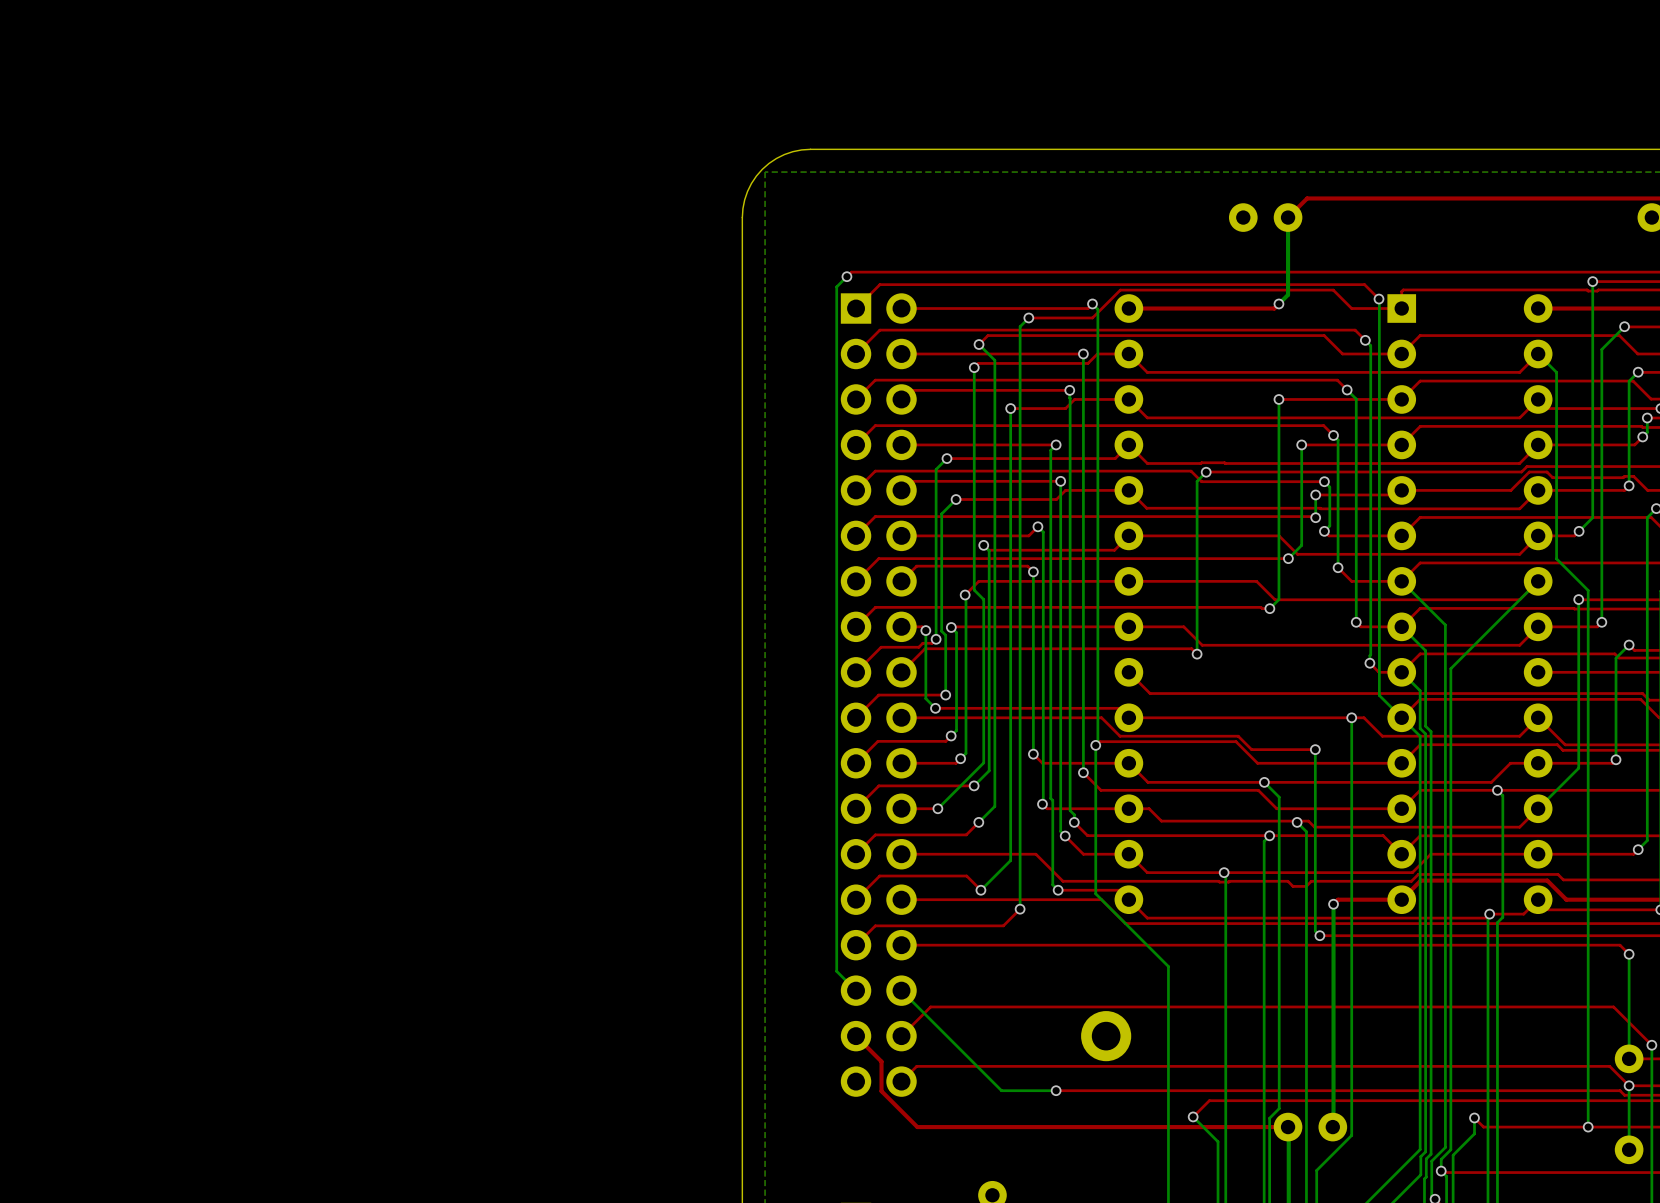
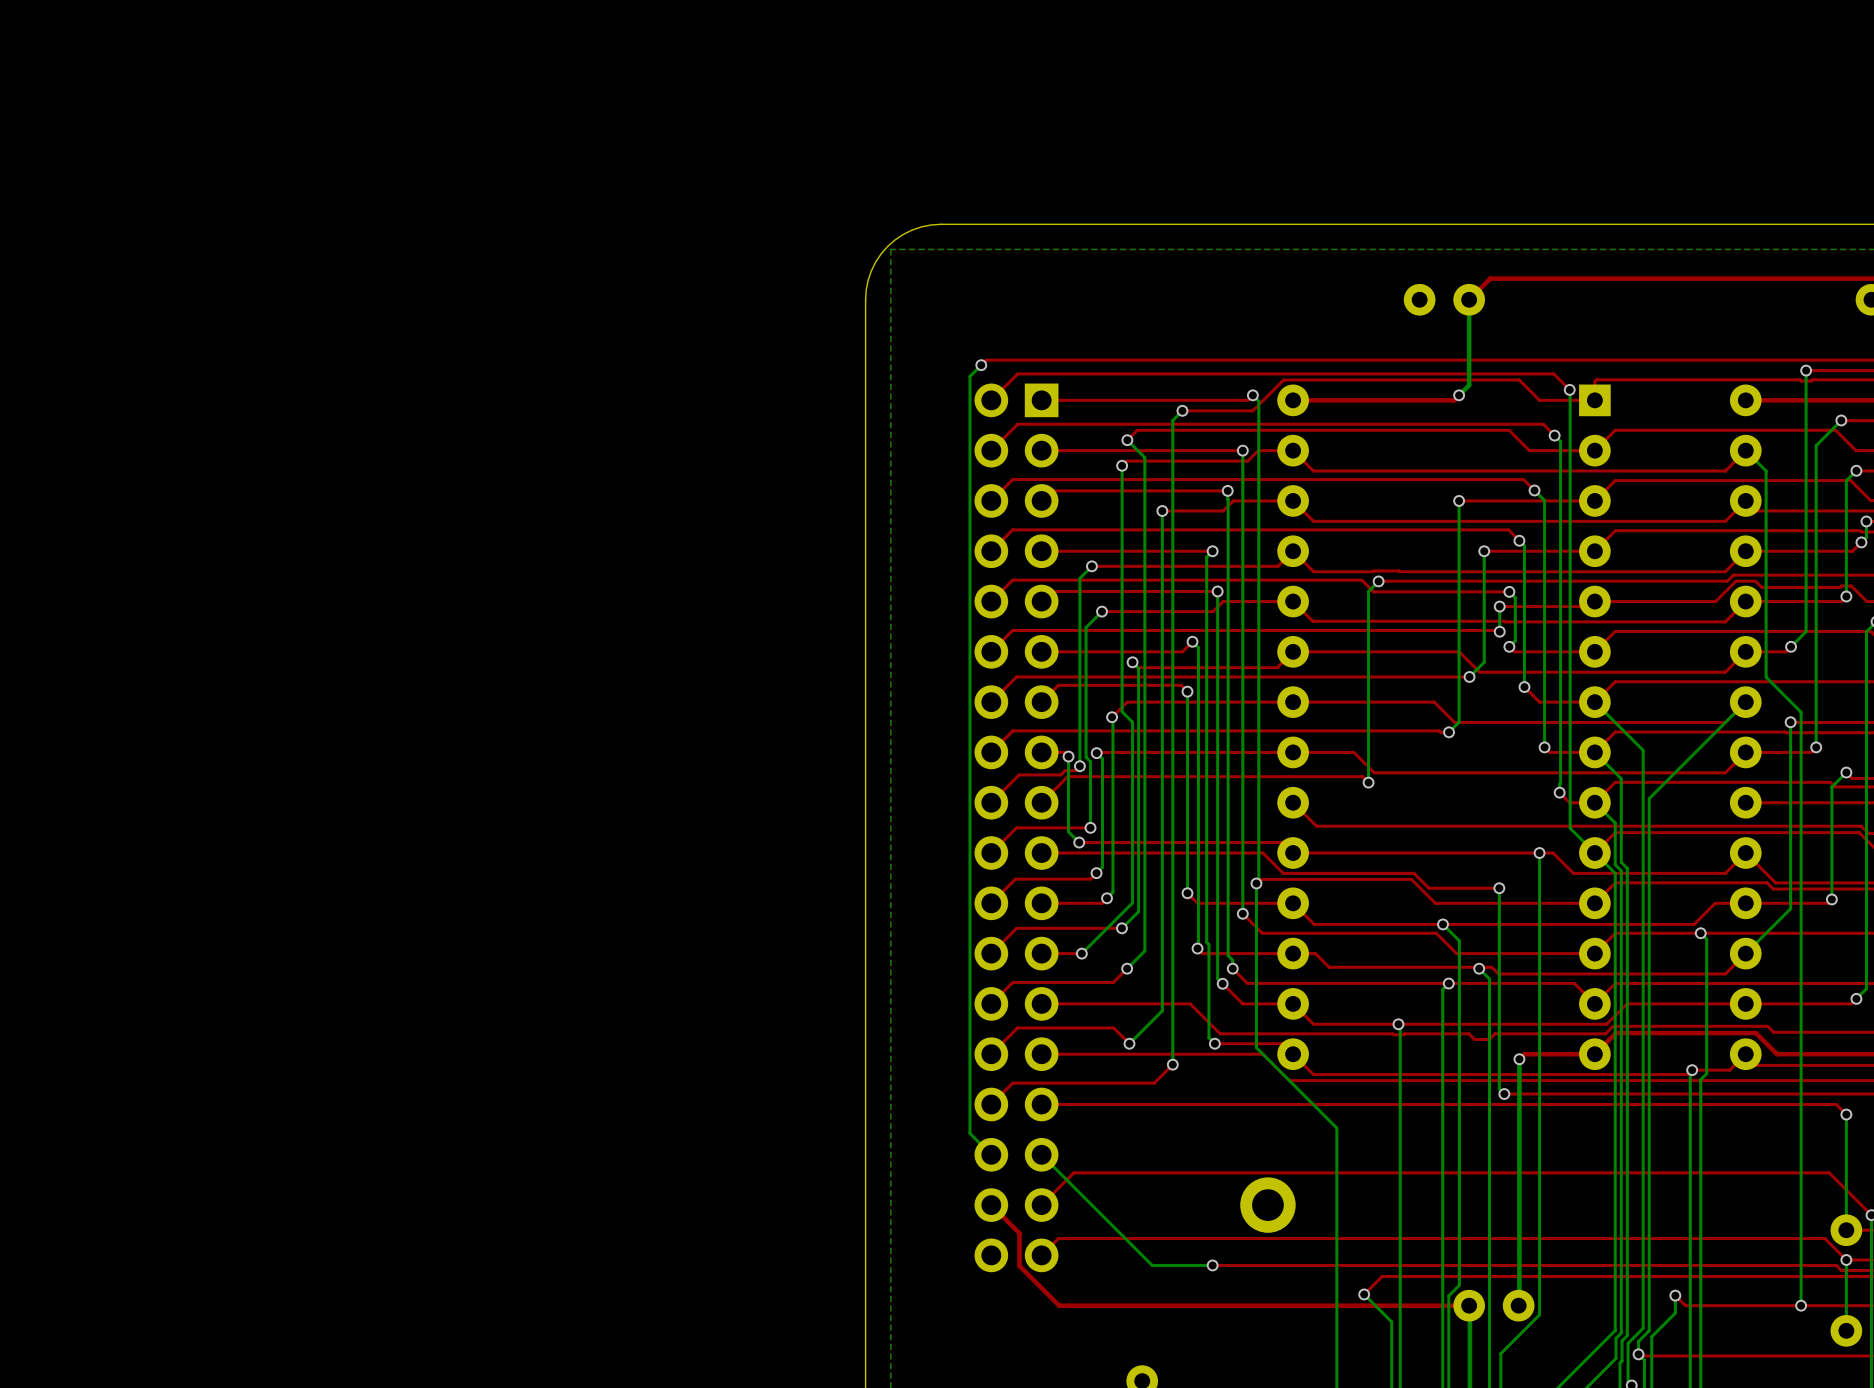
part footprint: [840, 293, 917, 1097] -> [974, 383, 1059, 1273]

